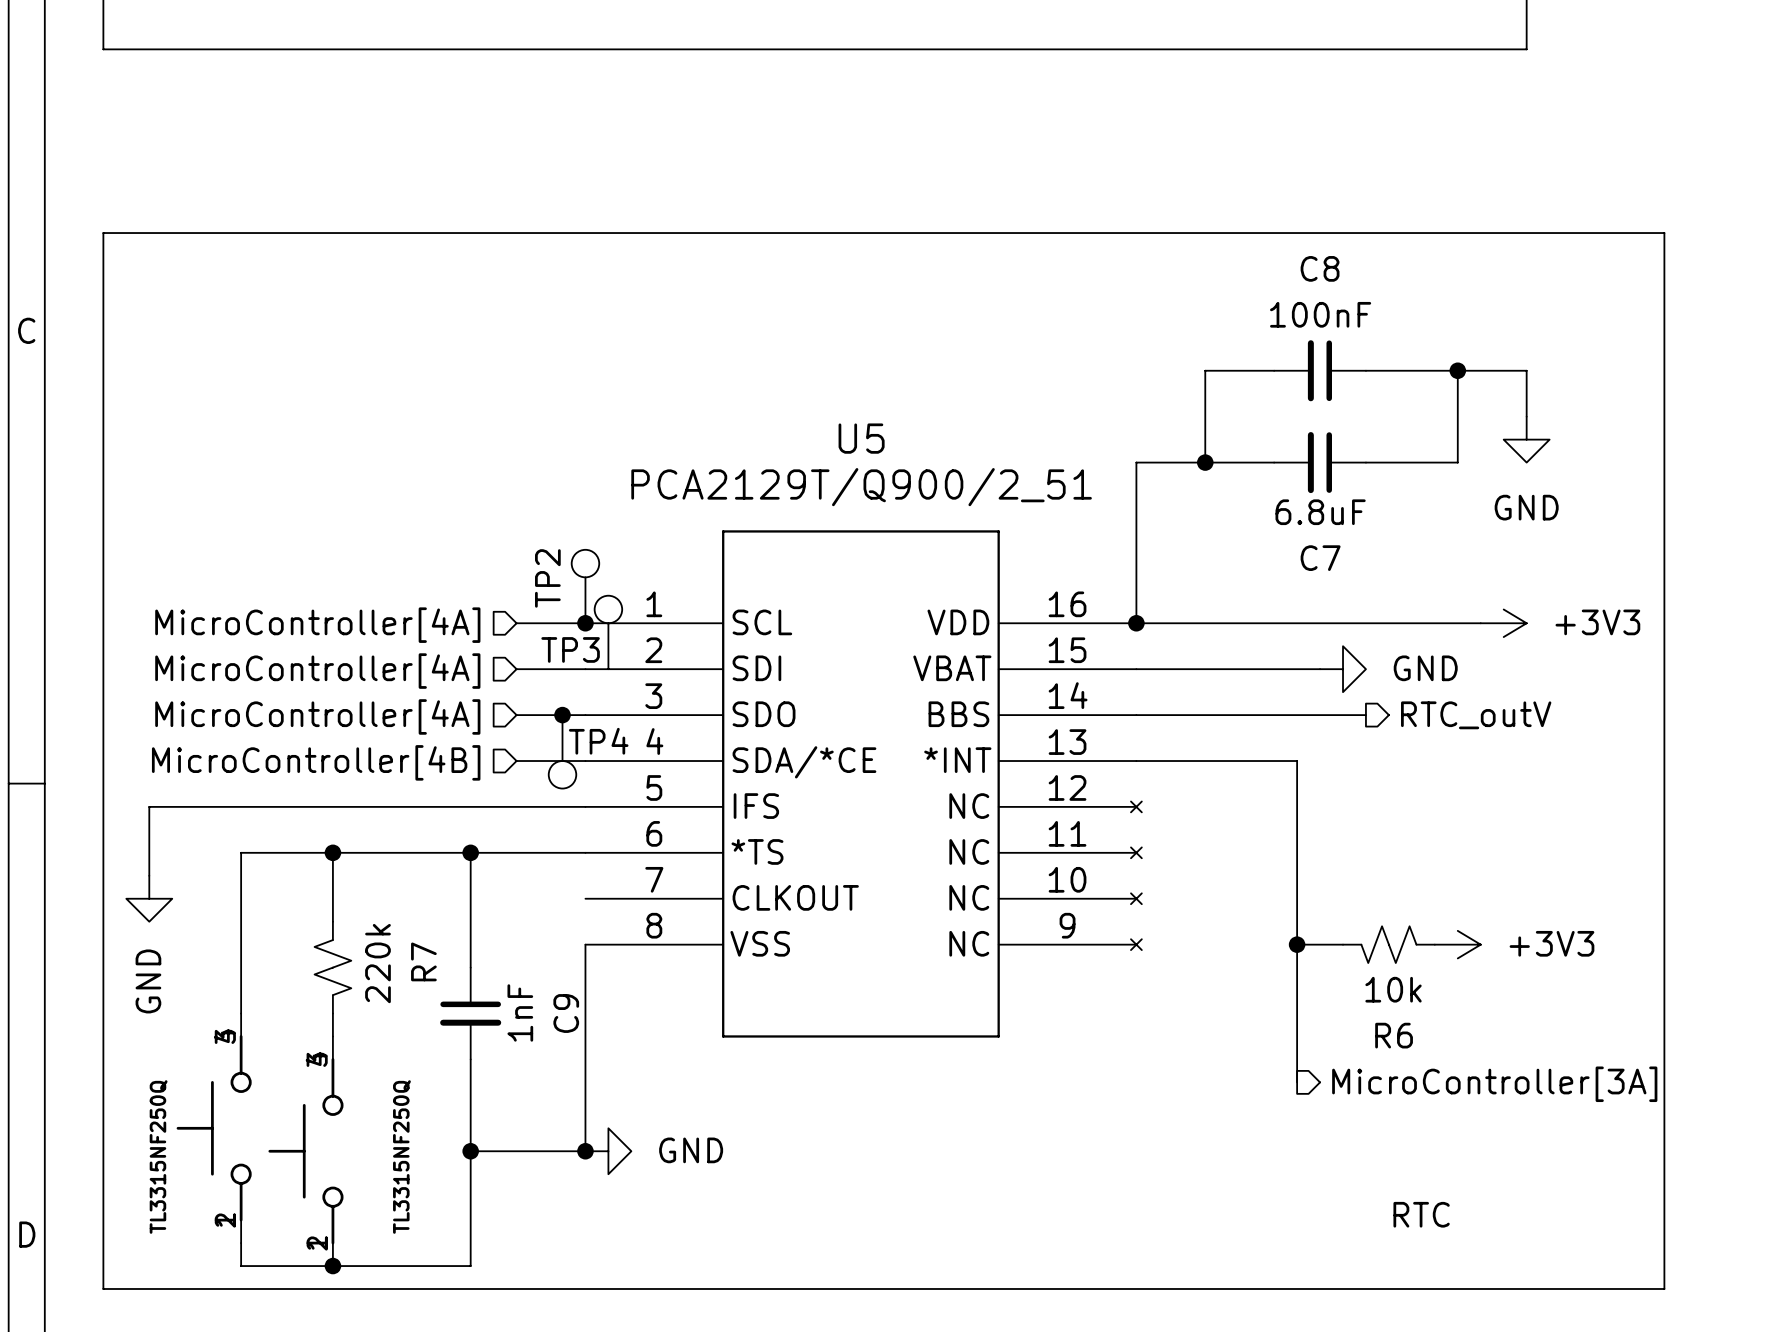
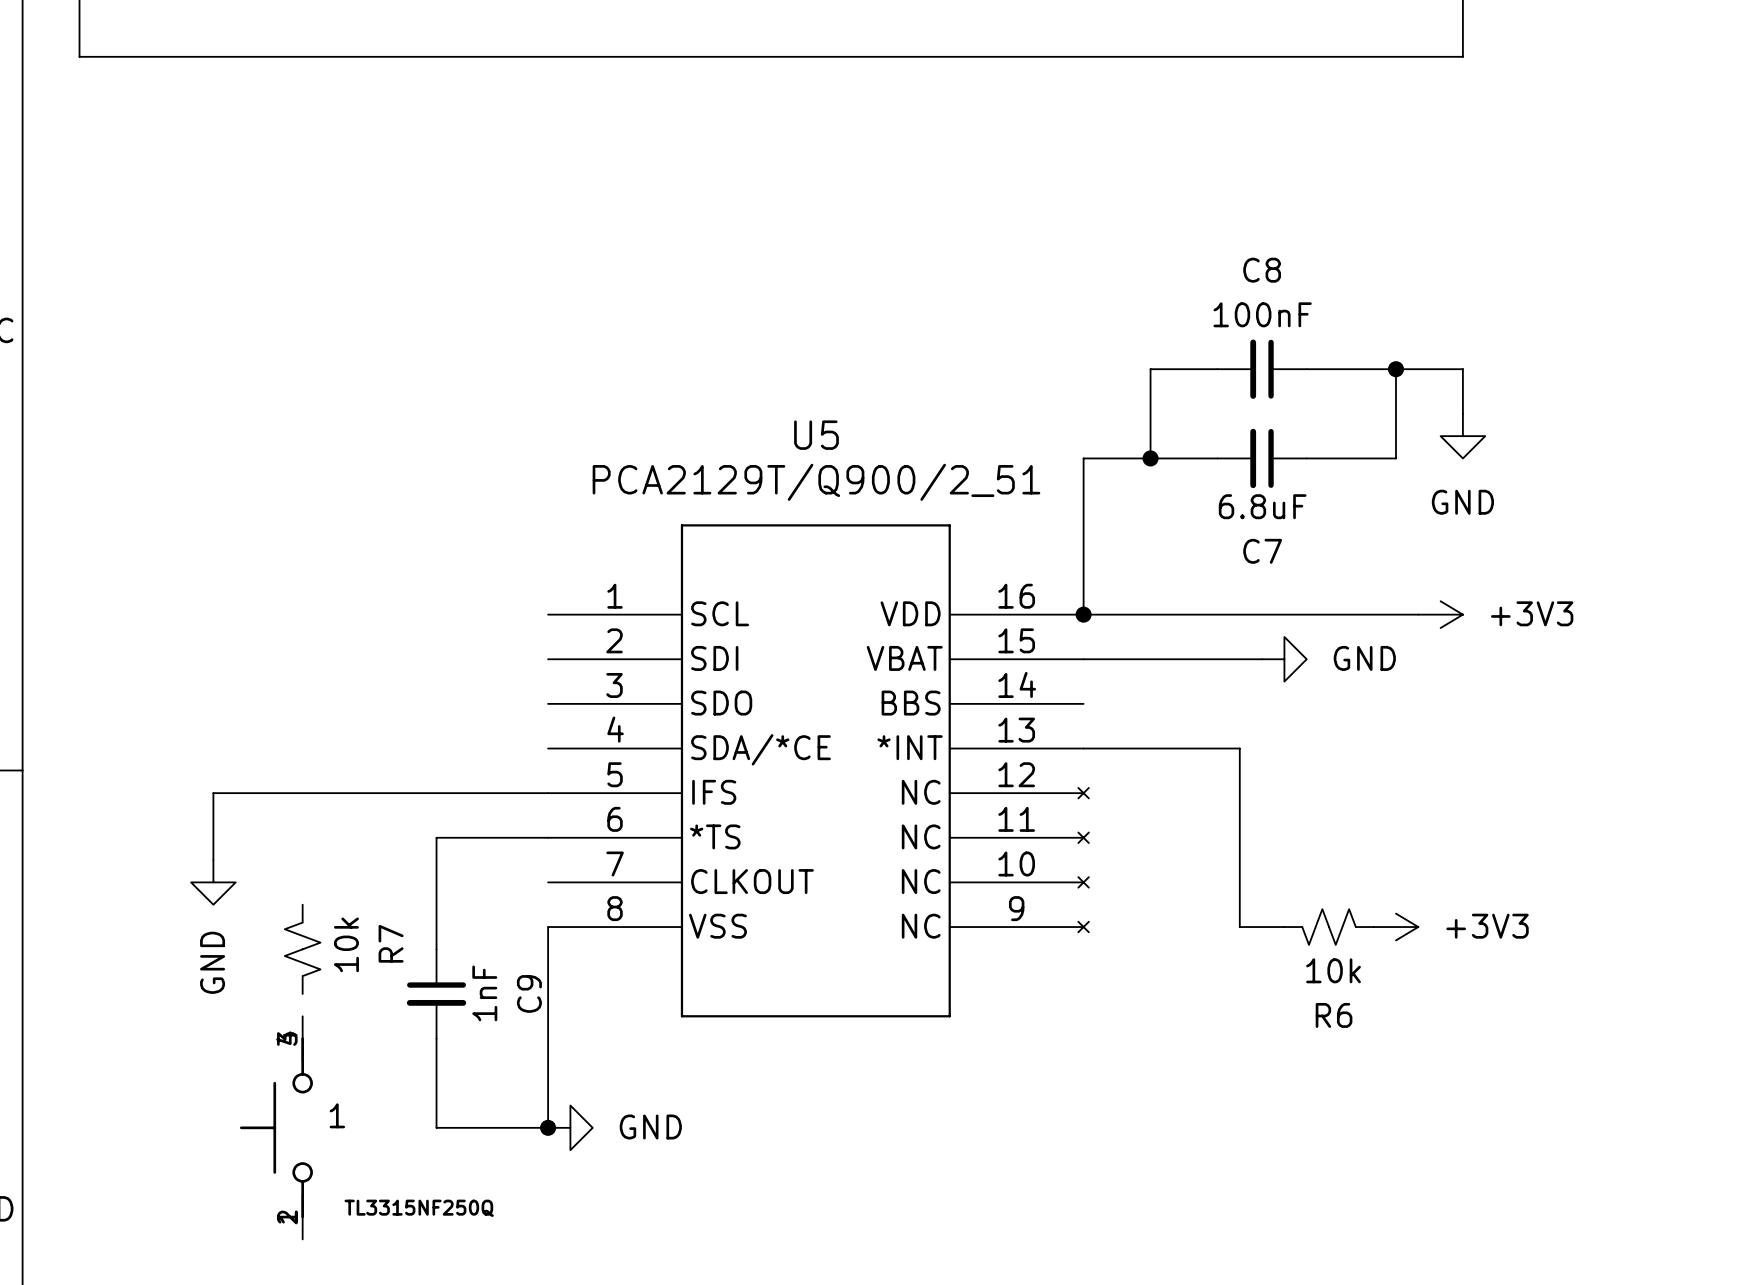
line: (103, 233) (1664, 233) (1664, 1288) (103, 1288) (103, 233) -> none
TP2: (585, 586) -> none
wire: (516, 623) (585, 623) -> none
junction: (585, 623) -> none
hierarchical label: MicroController[4A] (317, 625) -> none
TP3: (608, 632) -> none
wire: (516, 669) (585, 669) -> none
hierarchical label: MicroController[4A] (317, 671) -> none
wire: (516, 715) (585, 715) -> none
junction: (562, 715) -> none
wire: (1136, 715) (1365, 715) -> none
hierarchical label: RTC_outV (1476, 715) -> none
hierarchical label: MicroController[4A] (317, 716) -> none
TP4: (562, 751) -> none
wire: (516, 761) (585, 761) -> none
hierarchical label: MicroController[4B] (316, 762) -> none
wire: (241, 806) (149, 806) (149, 875) -> (213, 793) (213, 837)
wire: (241, 852) (470, 852) -> none
wire: (332, 852) (332, 921) -> none
junction: (332, 852) -> none
junction: (470, 852) -> none
wire: (241, 875) (241, 1013) -> none
power symbol position: GND (149, 898) -> GND (213, 882)
wire: (1297, 944) (1297, 1082) -> none
junction: (1297, 944) -> none
R7 value: 220k (378, 963) -> 10k (346, 944)
wire: (332, 1013) (332, 1036) -> none
hierarchical label: MicroController[3A] (1494, 1084) -> none
part: TL3315NF250Q (214, 1128) -> none
1 name: none -> 1 (337, 1115)
wire: (470, 1151) (470, 1266) (241, 1266) (241, 1243) -> none
junction: (470, 1151) -> none
1 value rotation: 0° (401, 1157) -> 90° clockwise (419, 1208)
text: RTC (1421, 1214) -> none
junction: (332, 1266) -> none

